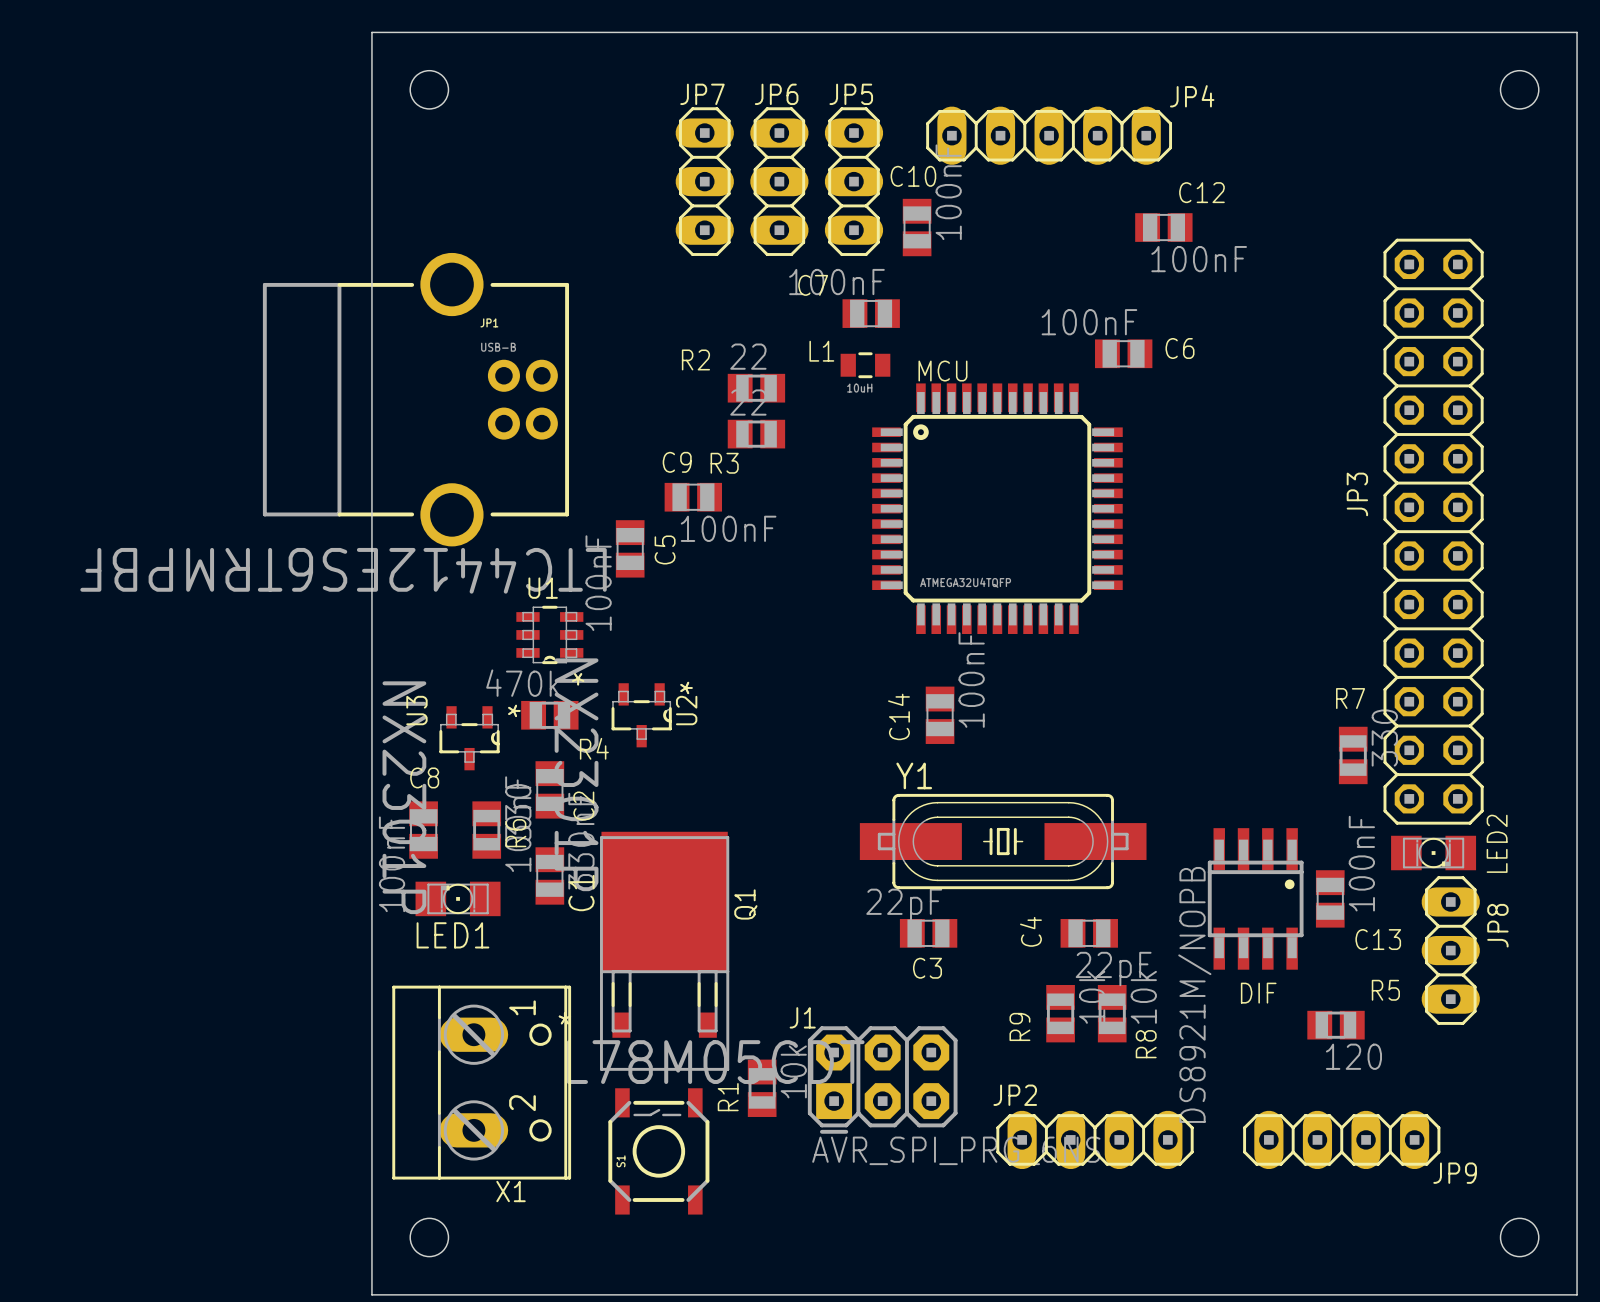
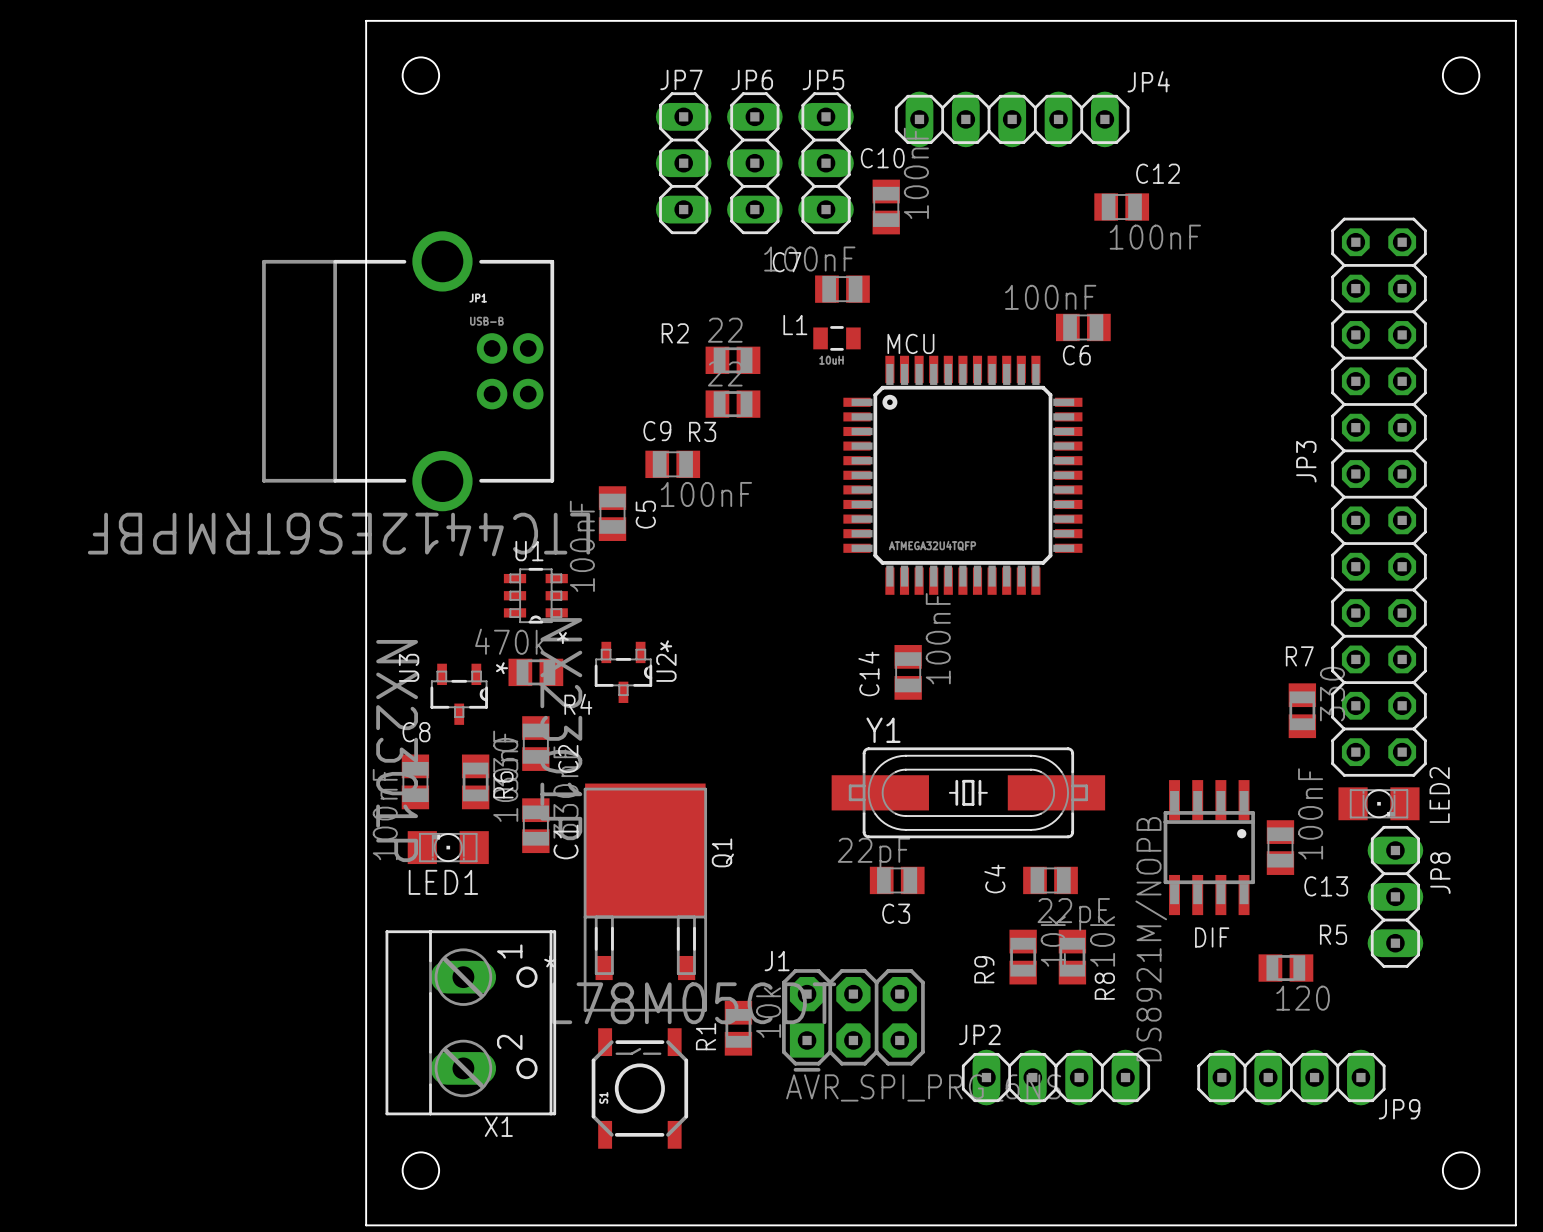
C6 name position: C6 (1179, 348) -> C6 (1076, 355)

